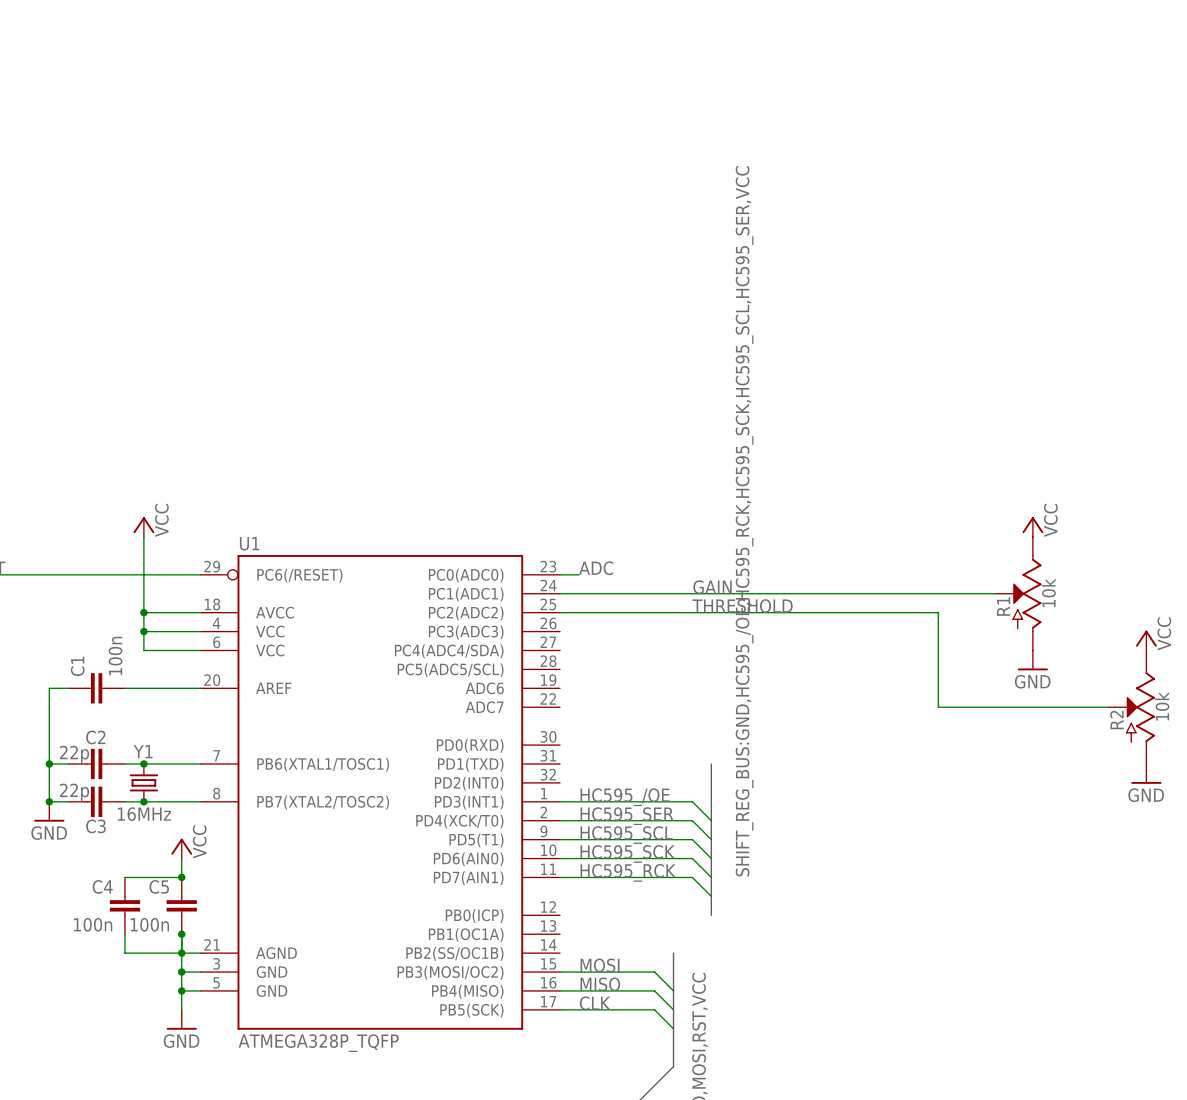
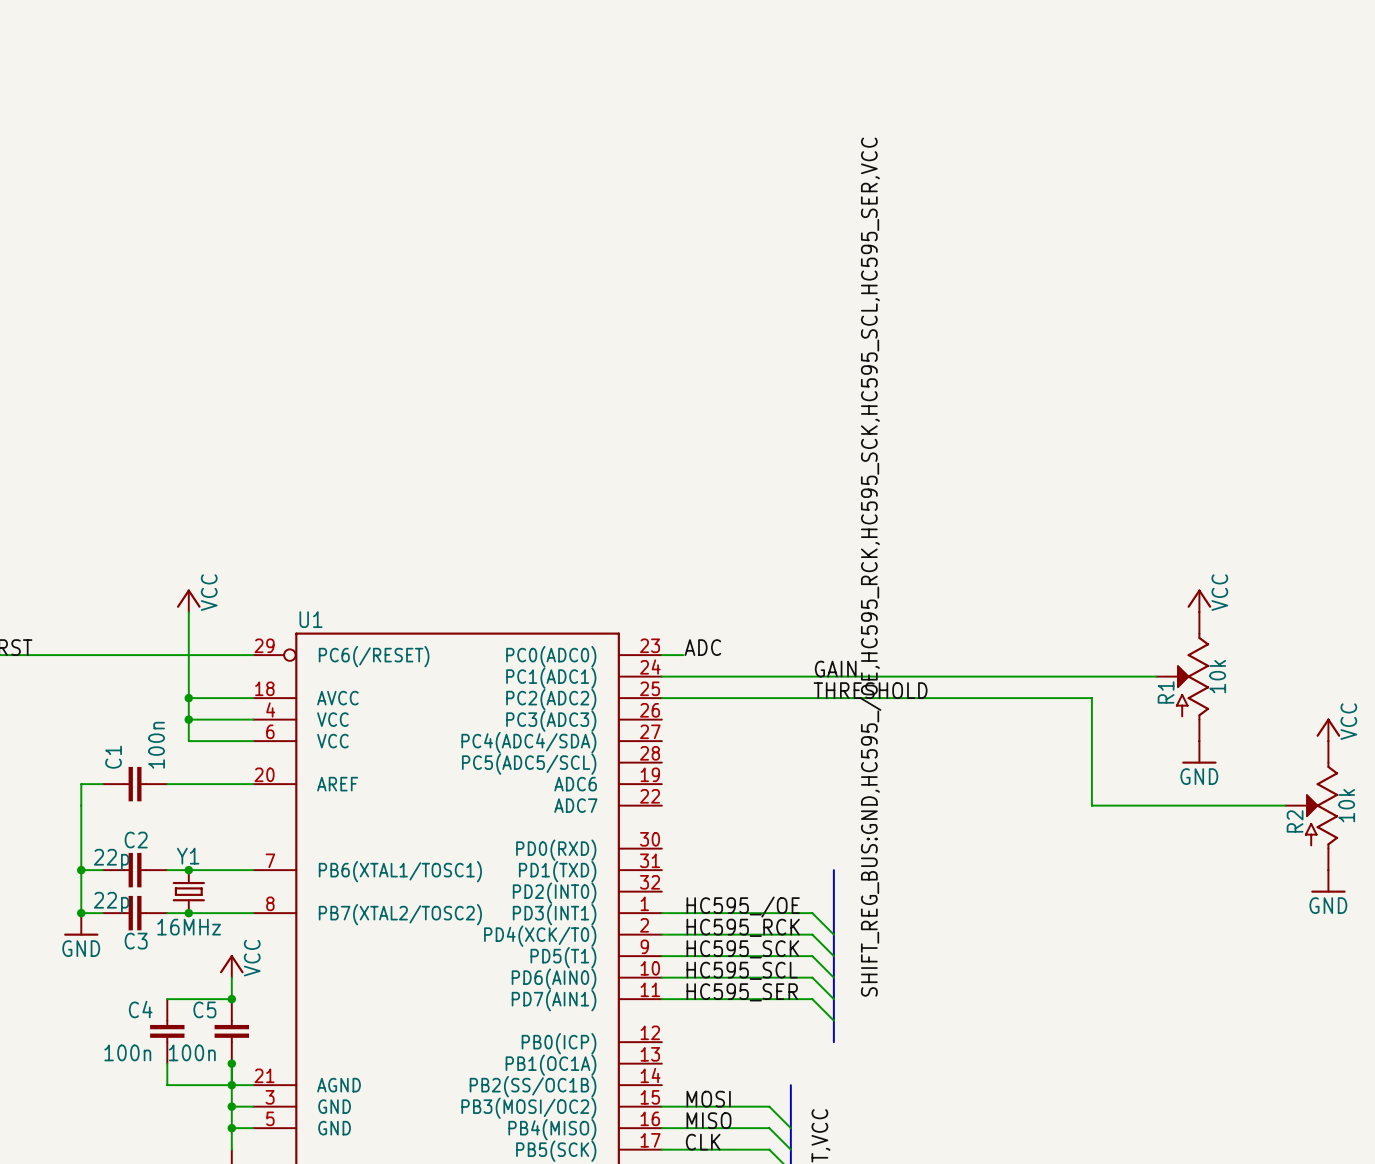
label: HC595_SER (627, 816) -> HC595_RCK (743, 927)
label: HC595_SCL (626, 835) -> HC595_SCK (742, 949)
label: HC595_SCK (627, 853) -> HC595_SCL (742, 970)
label: HC595_RCK (628, 872) -> HC595_SER (742, 992)

